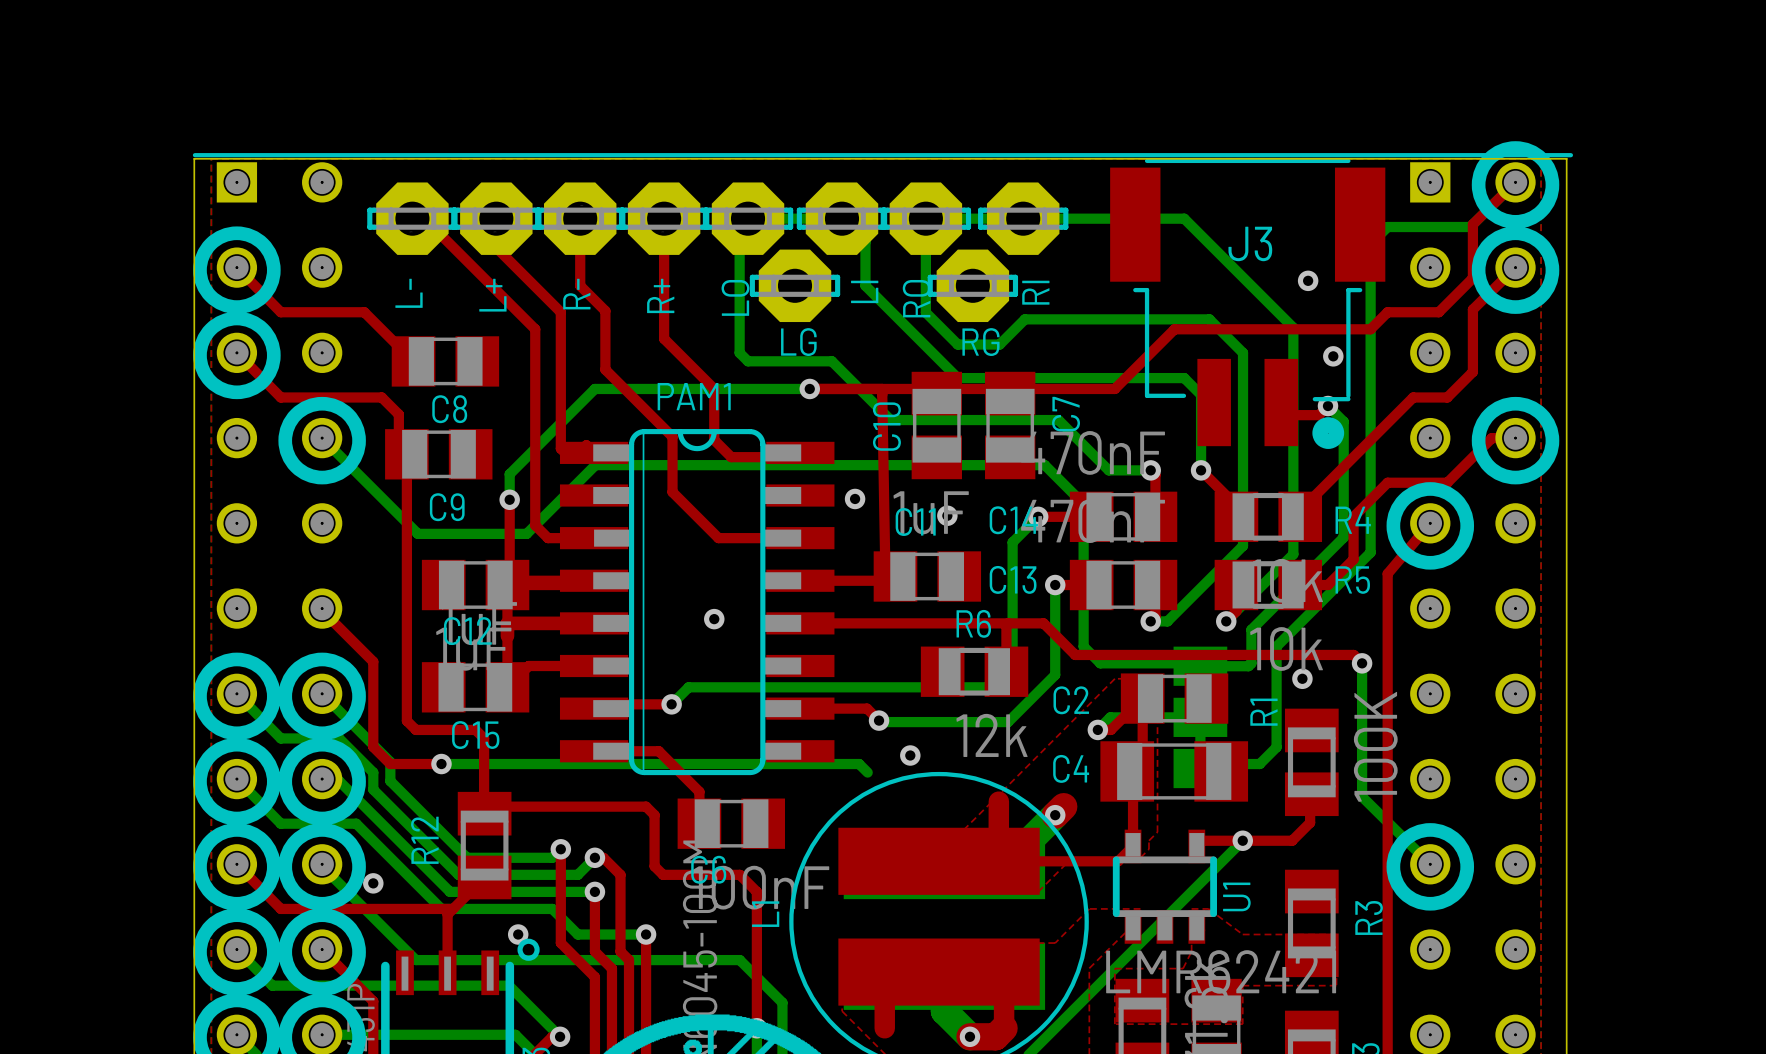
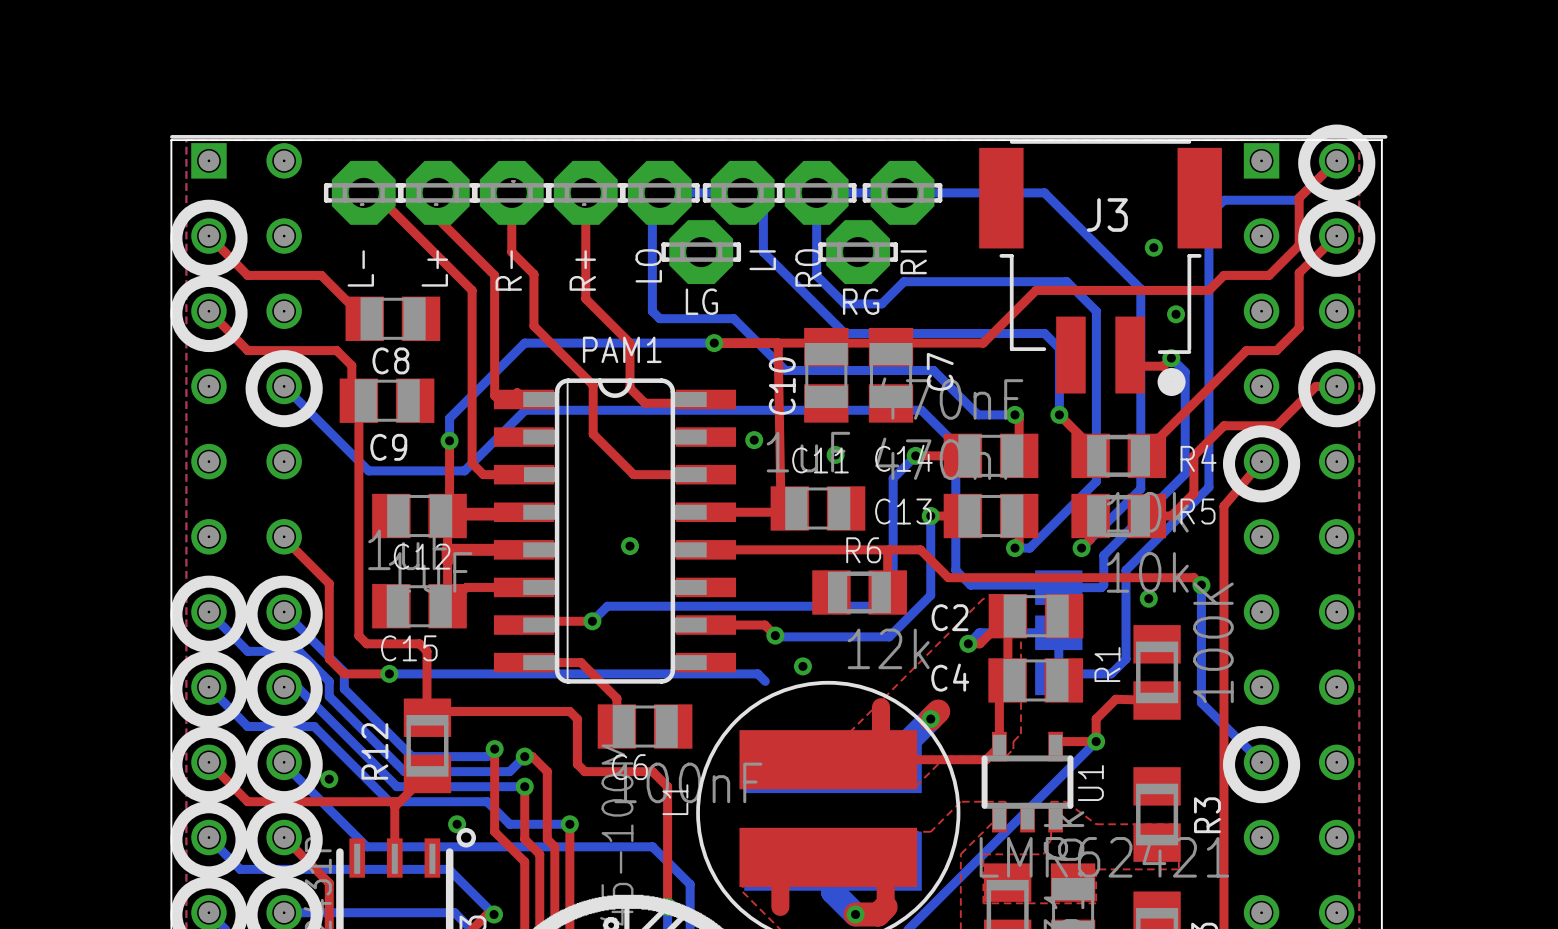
R1 name position: R1 (1263, 712) -> R1 (1107, 664)
C4 footprint: [1100, 741, 1249, 802] -> [988, 658, 1084, 703]
top track: (1311, 794) (1310, 795) (1310, 822) (1292, 840) (1242, 840) -> (1157, 700) (1115, 699) (1096, 719) (1096, 741)

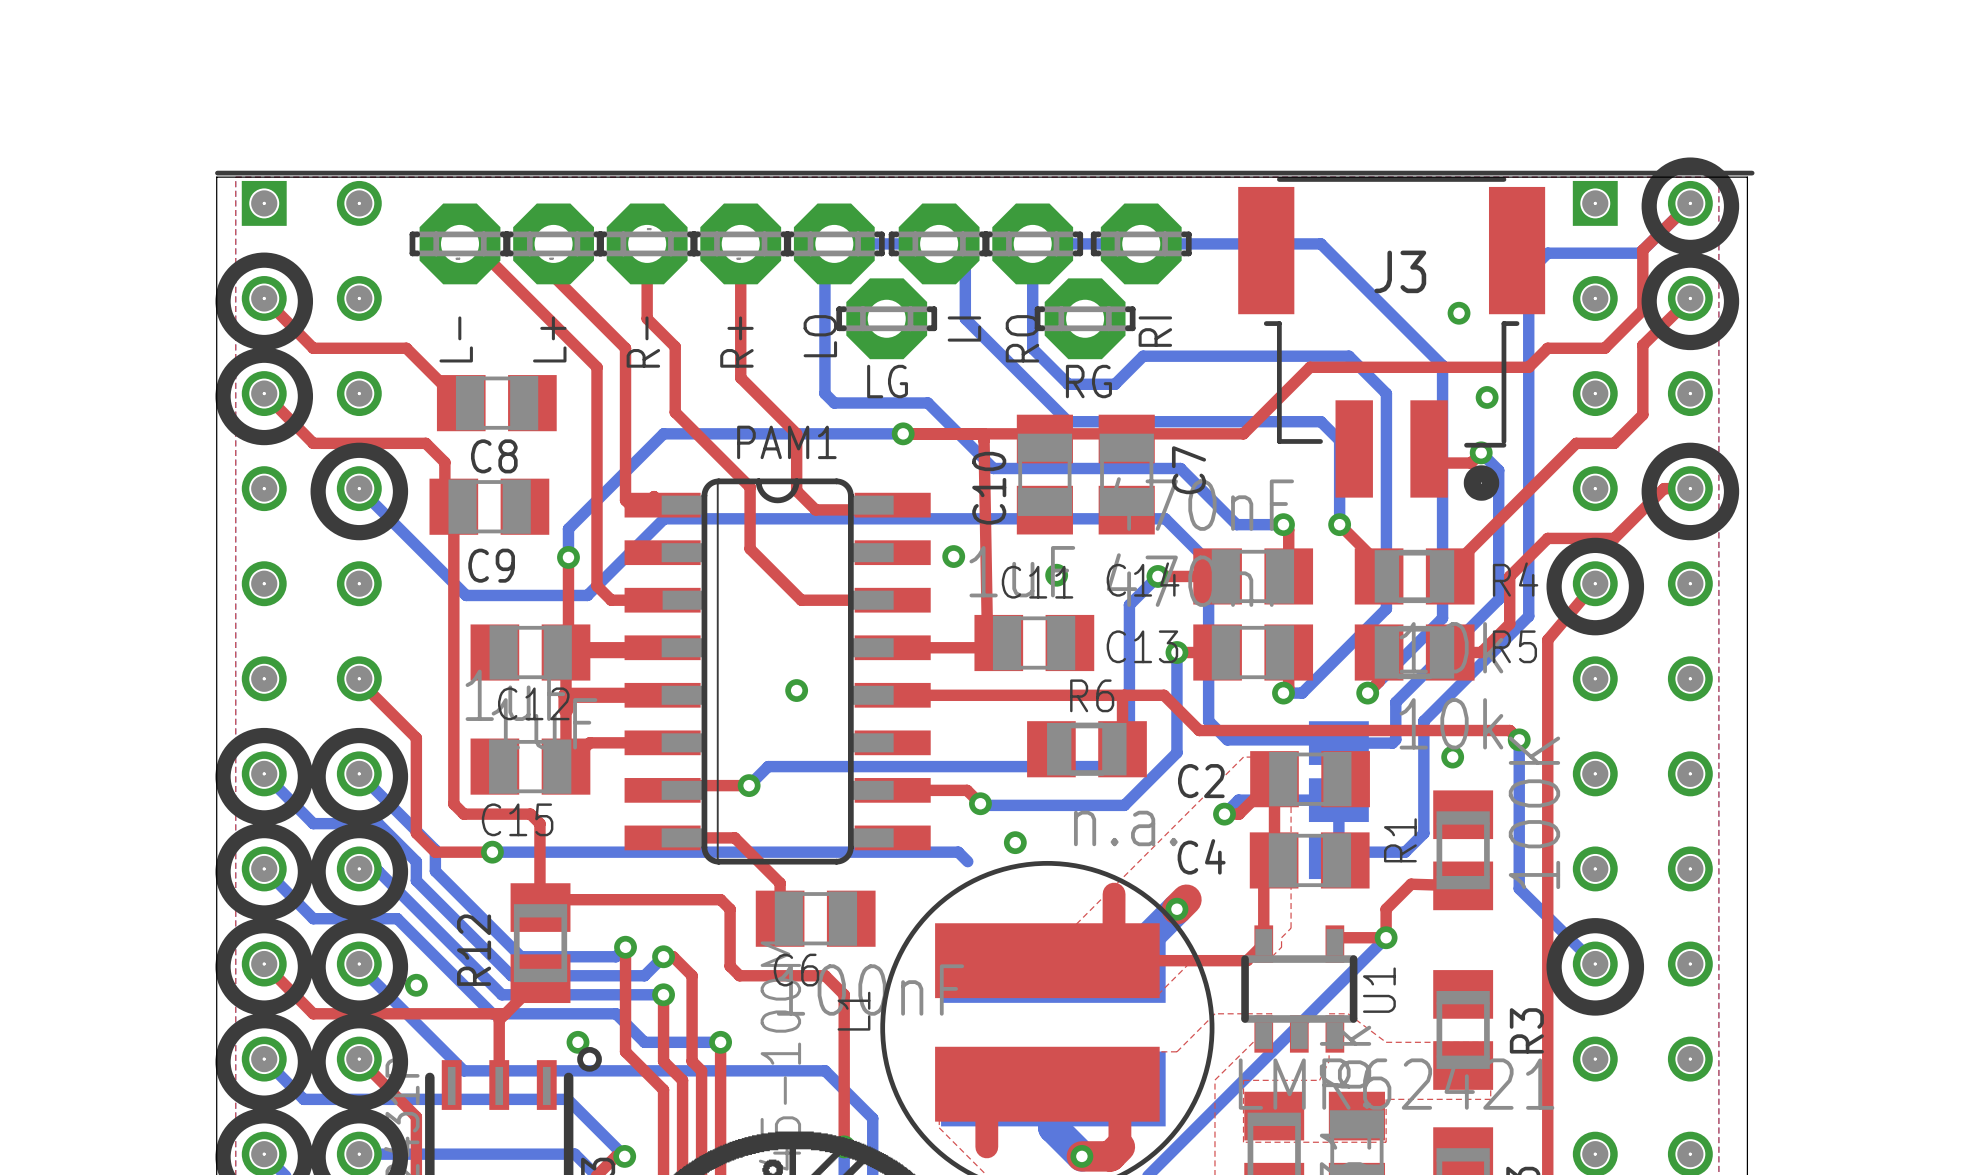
R6 value: 12k (888, 648) -> n.a. (1125, 828)

